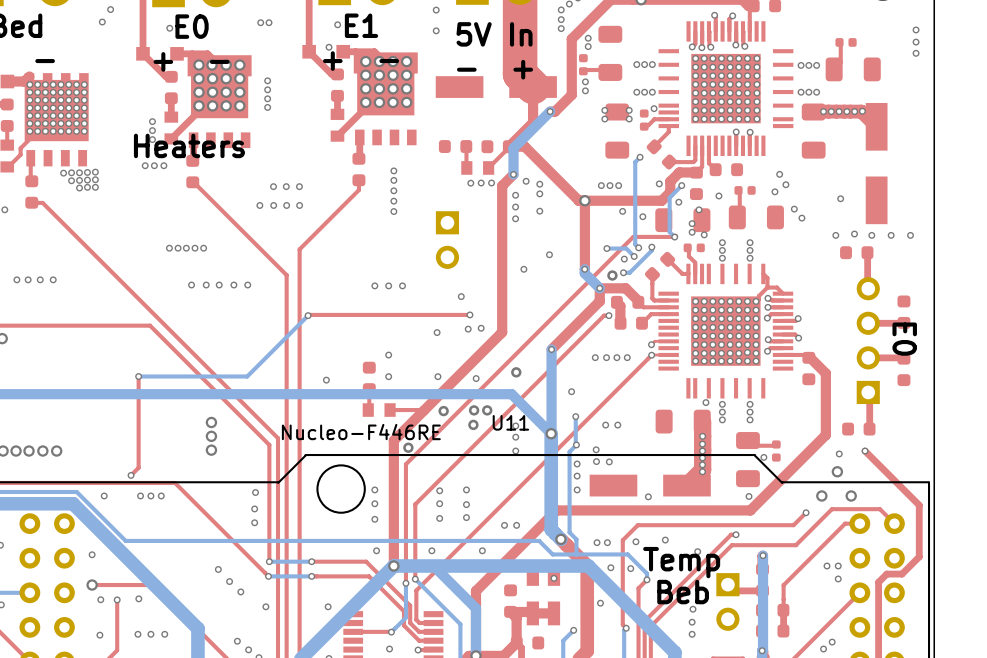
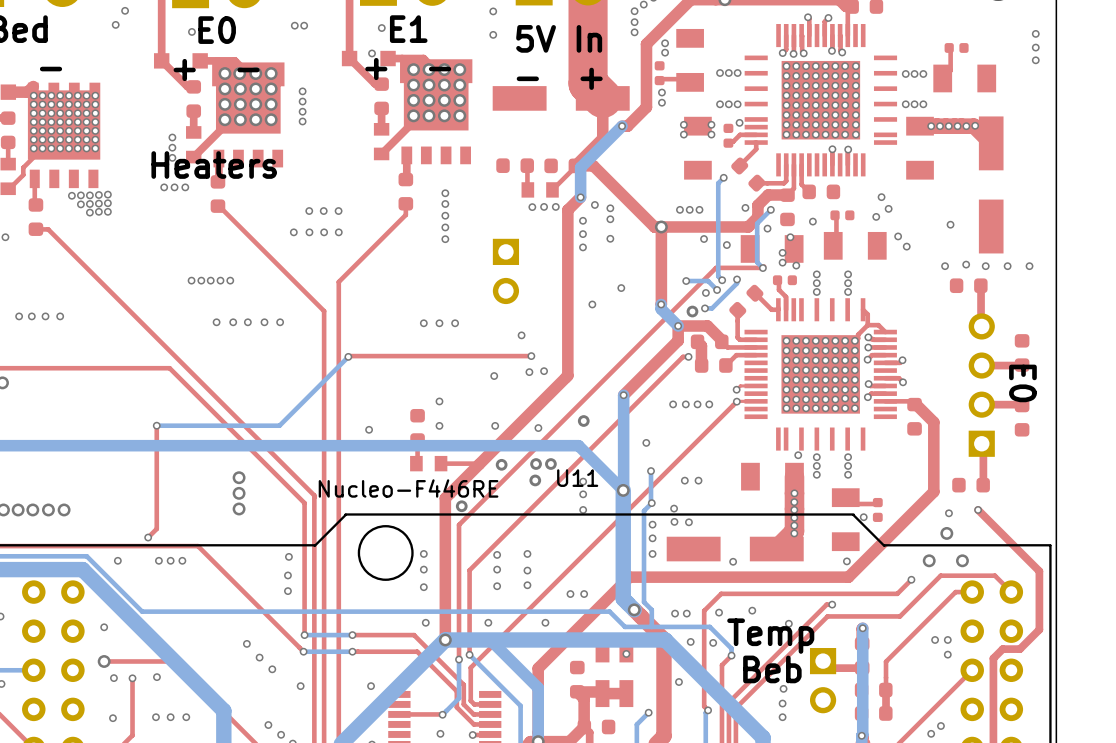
part footprint: [598, 25, 623, 81] -> [676, 28, 704, 92]
part footprint: [825, 57, 881, 82] -> [933, 64, 997, 93]
part footprint: [605, 103, 630, 159] -> [684, 116, 712, 180]
part footprint: [801, 103, 826, 159] -> [906, 116, 934, 180]
part footprint: [728, 205, 784, 230] -> [823, 231, 887, 260]
part footprint: [655, 208, 711, 233] -> [740, 235, 804, 263]
part footprint: [655, 409, 711, 434] -> [741, 462, 804, 491]
part footprint: [736, 432, 760, 488] -> [831, 488, 860, 552]

